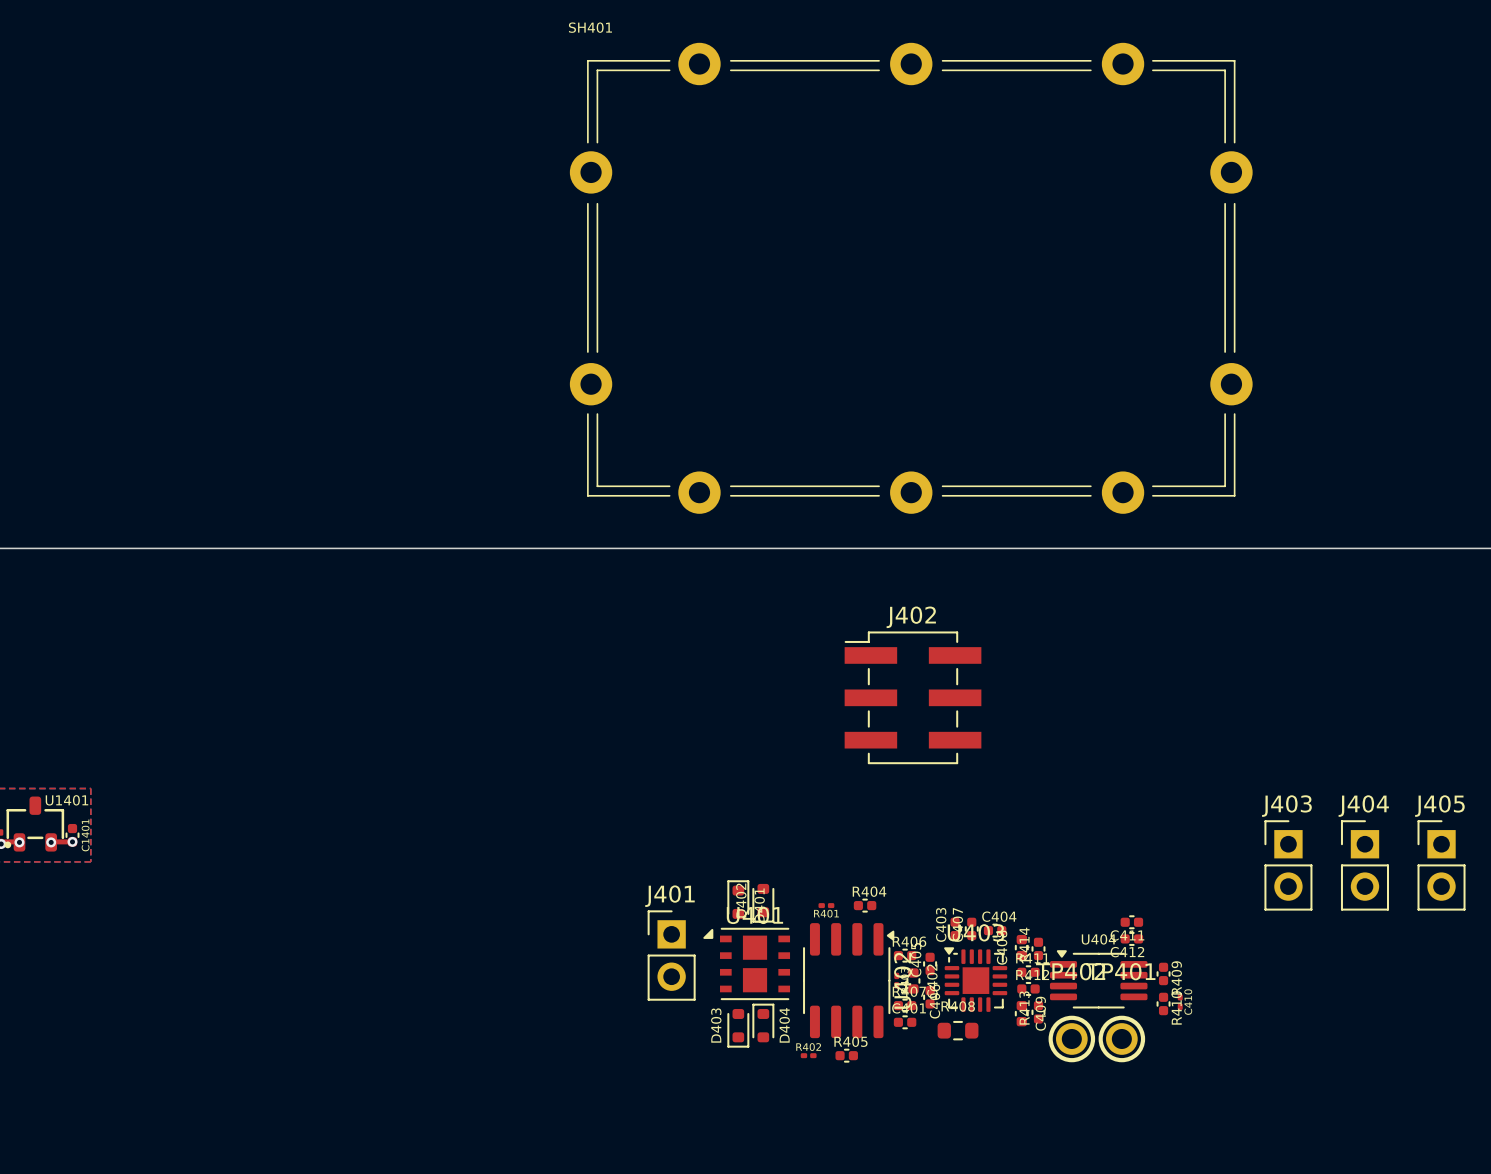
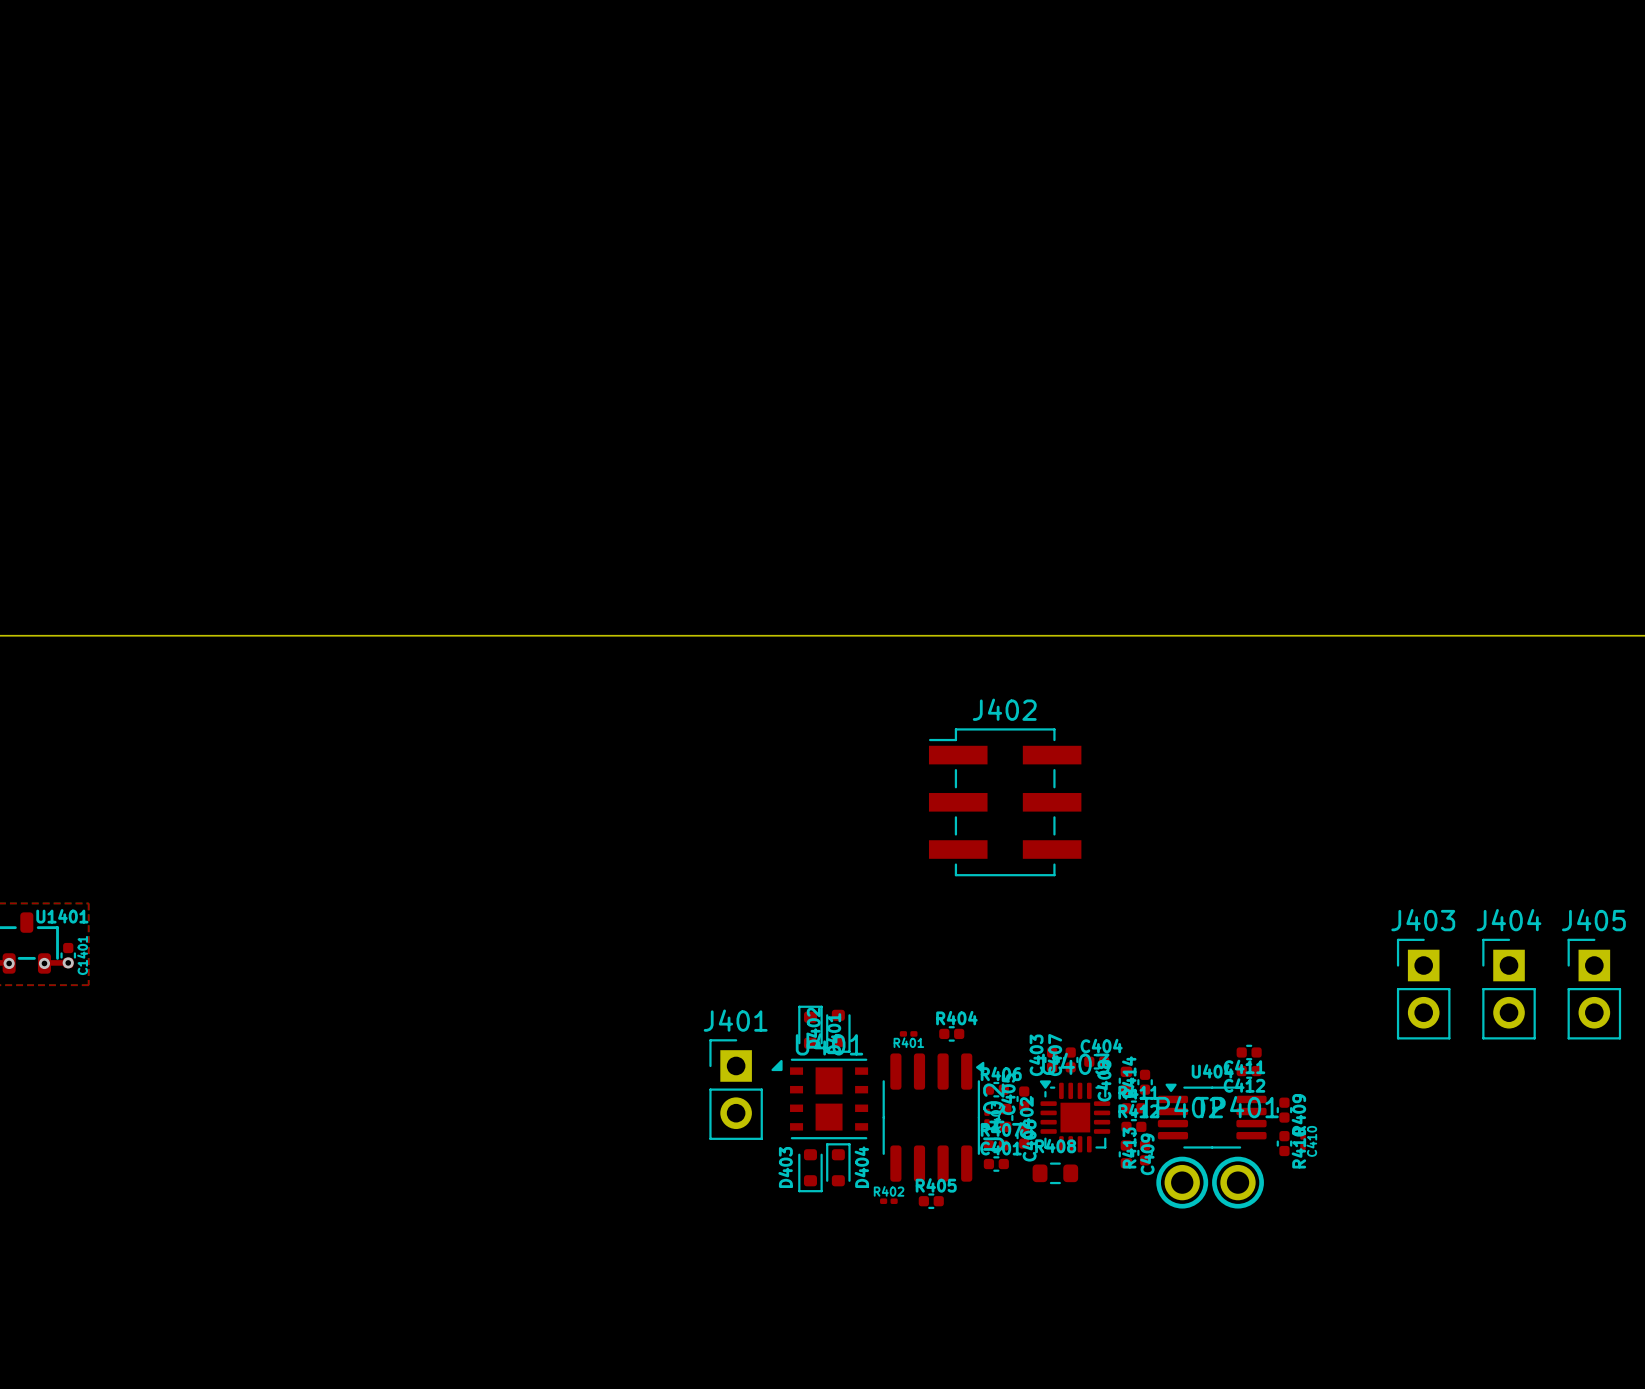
SH401: (911, 278) -> none

